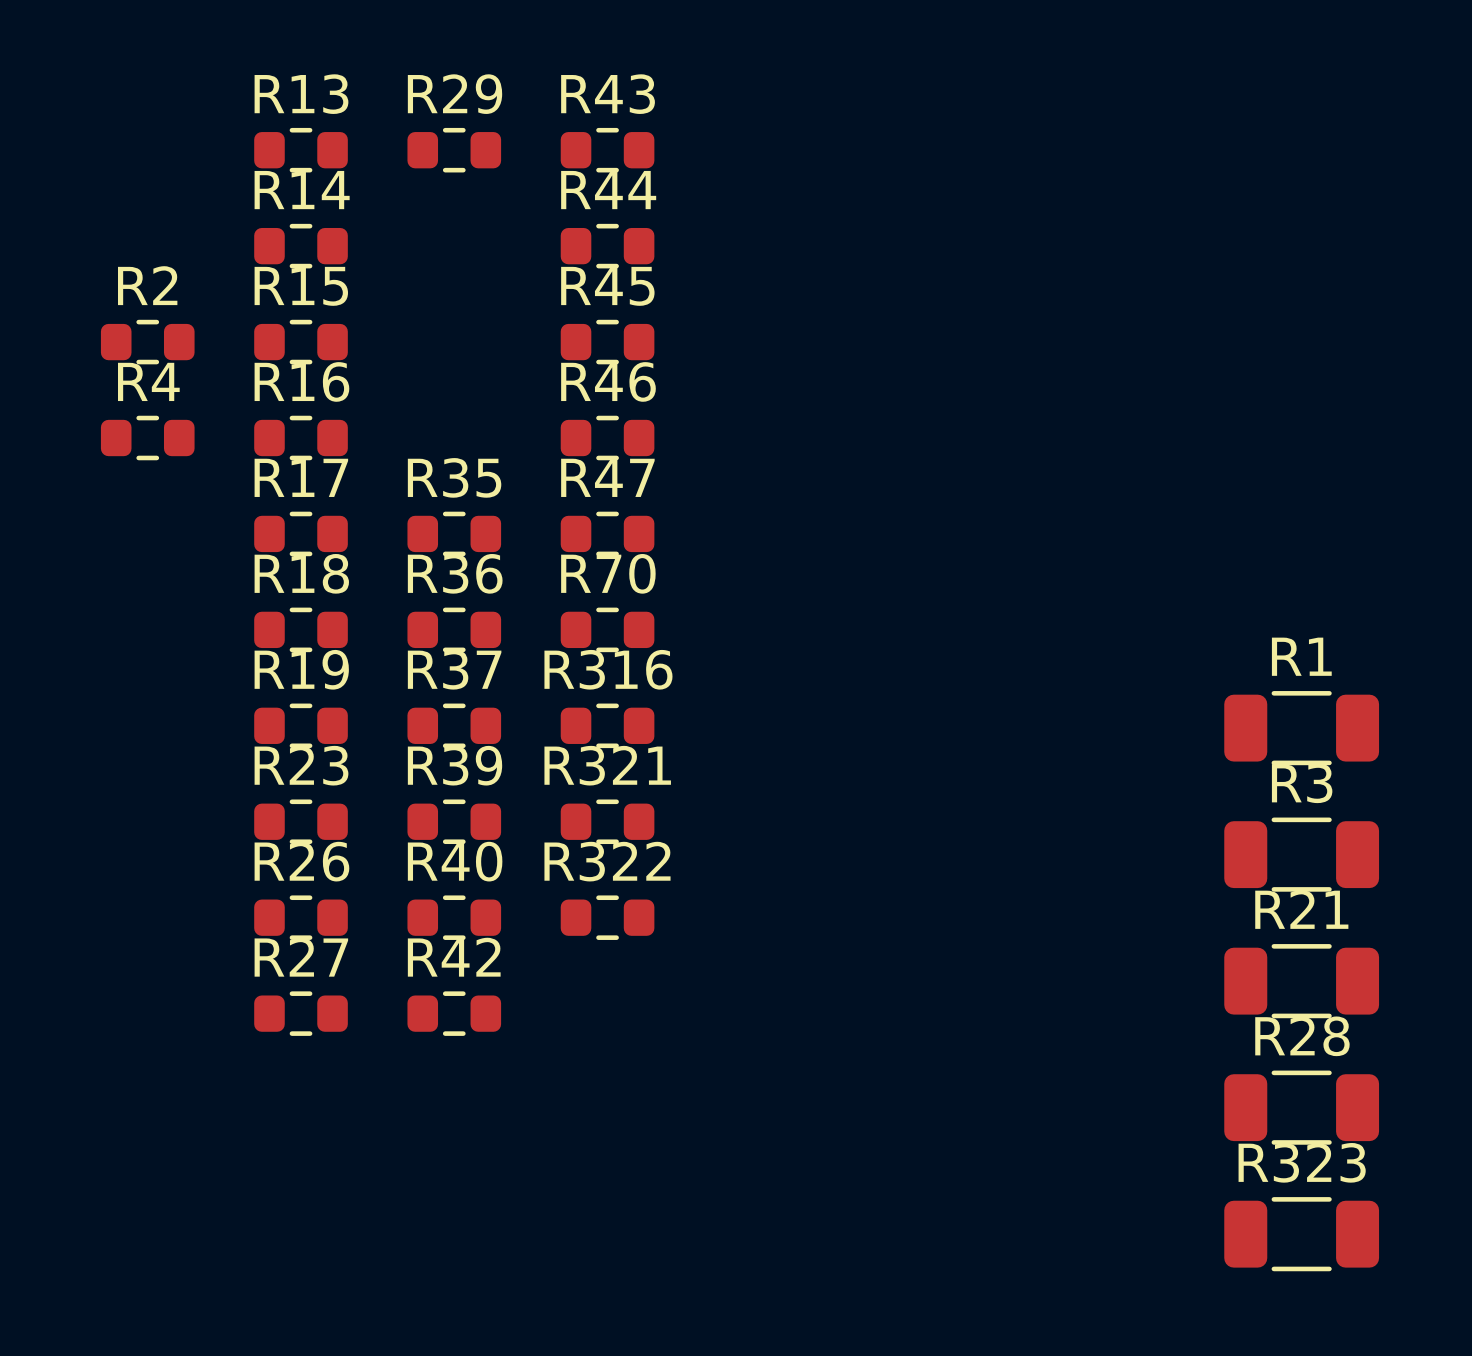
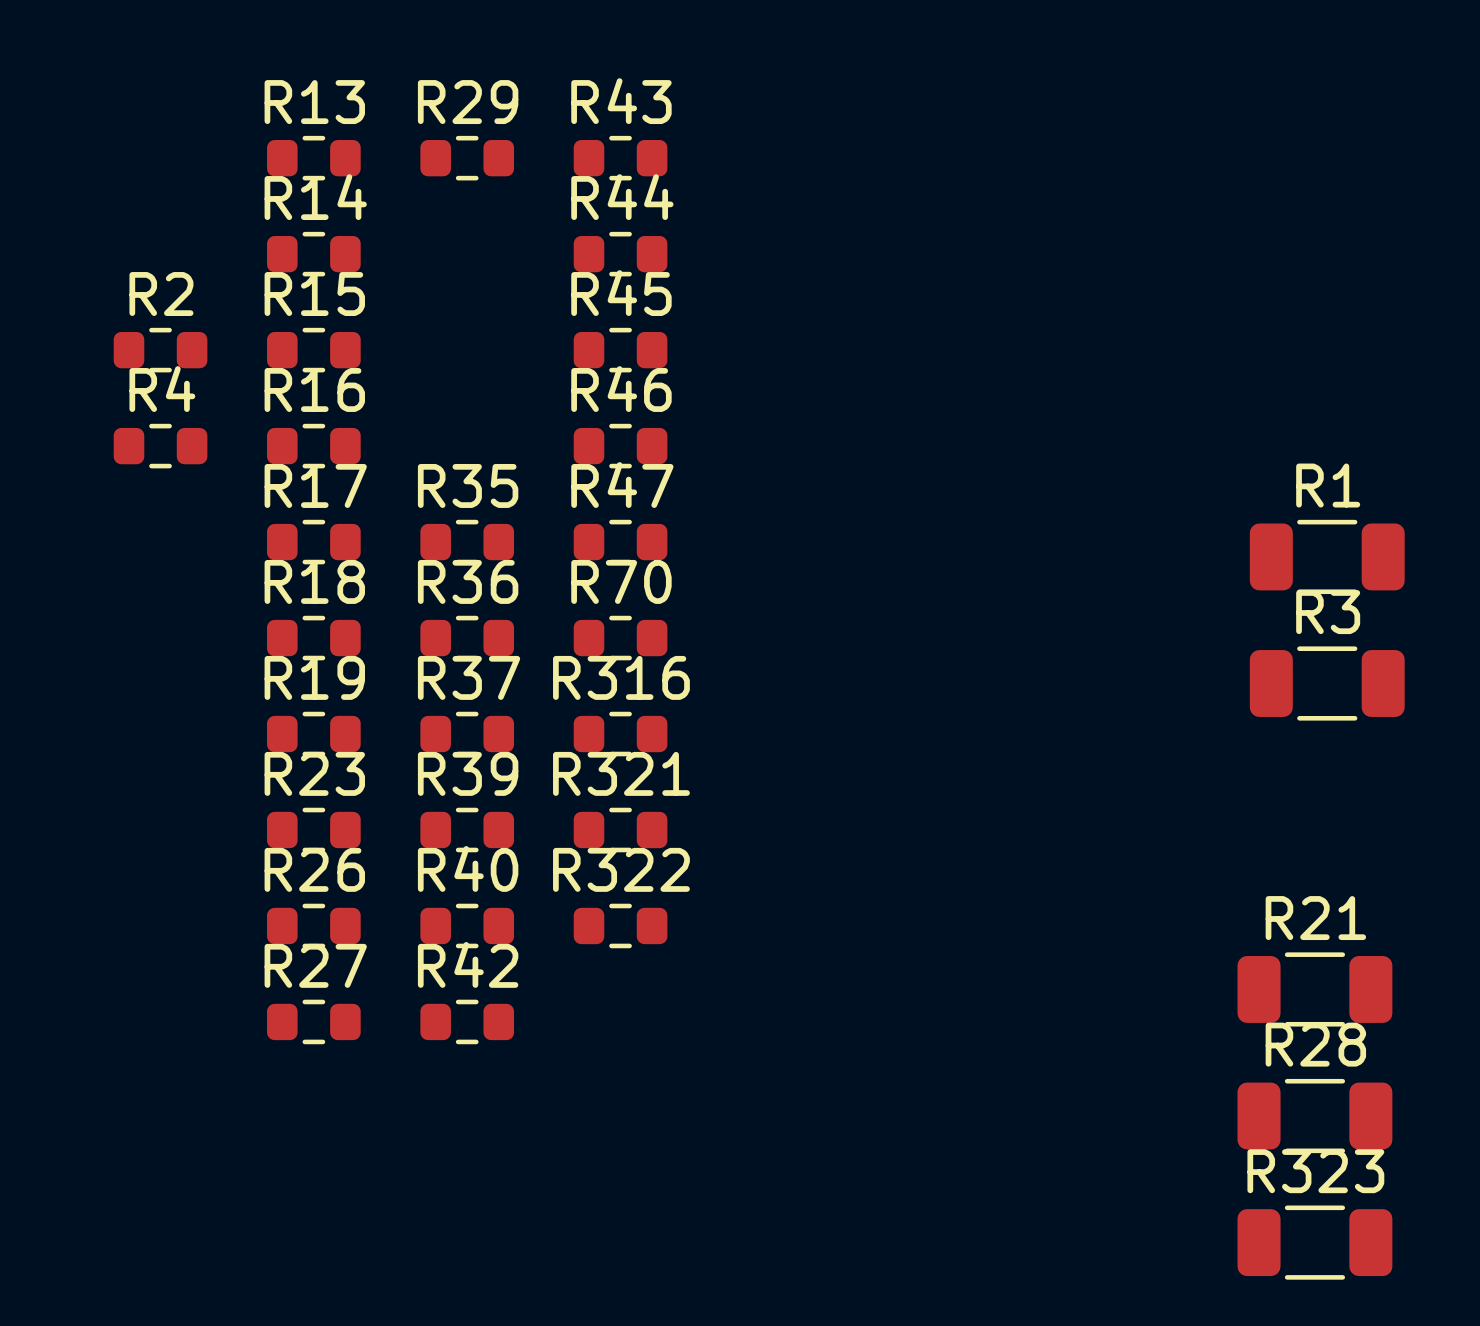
R1 position: (1301, 728) -> (1327, 556)
R3 position: (1301, 854) -> (1327, 683)

